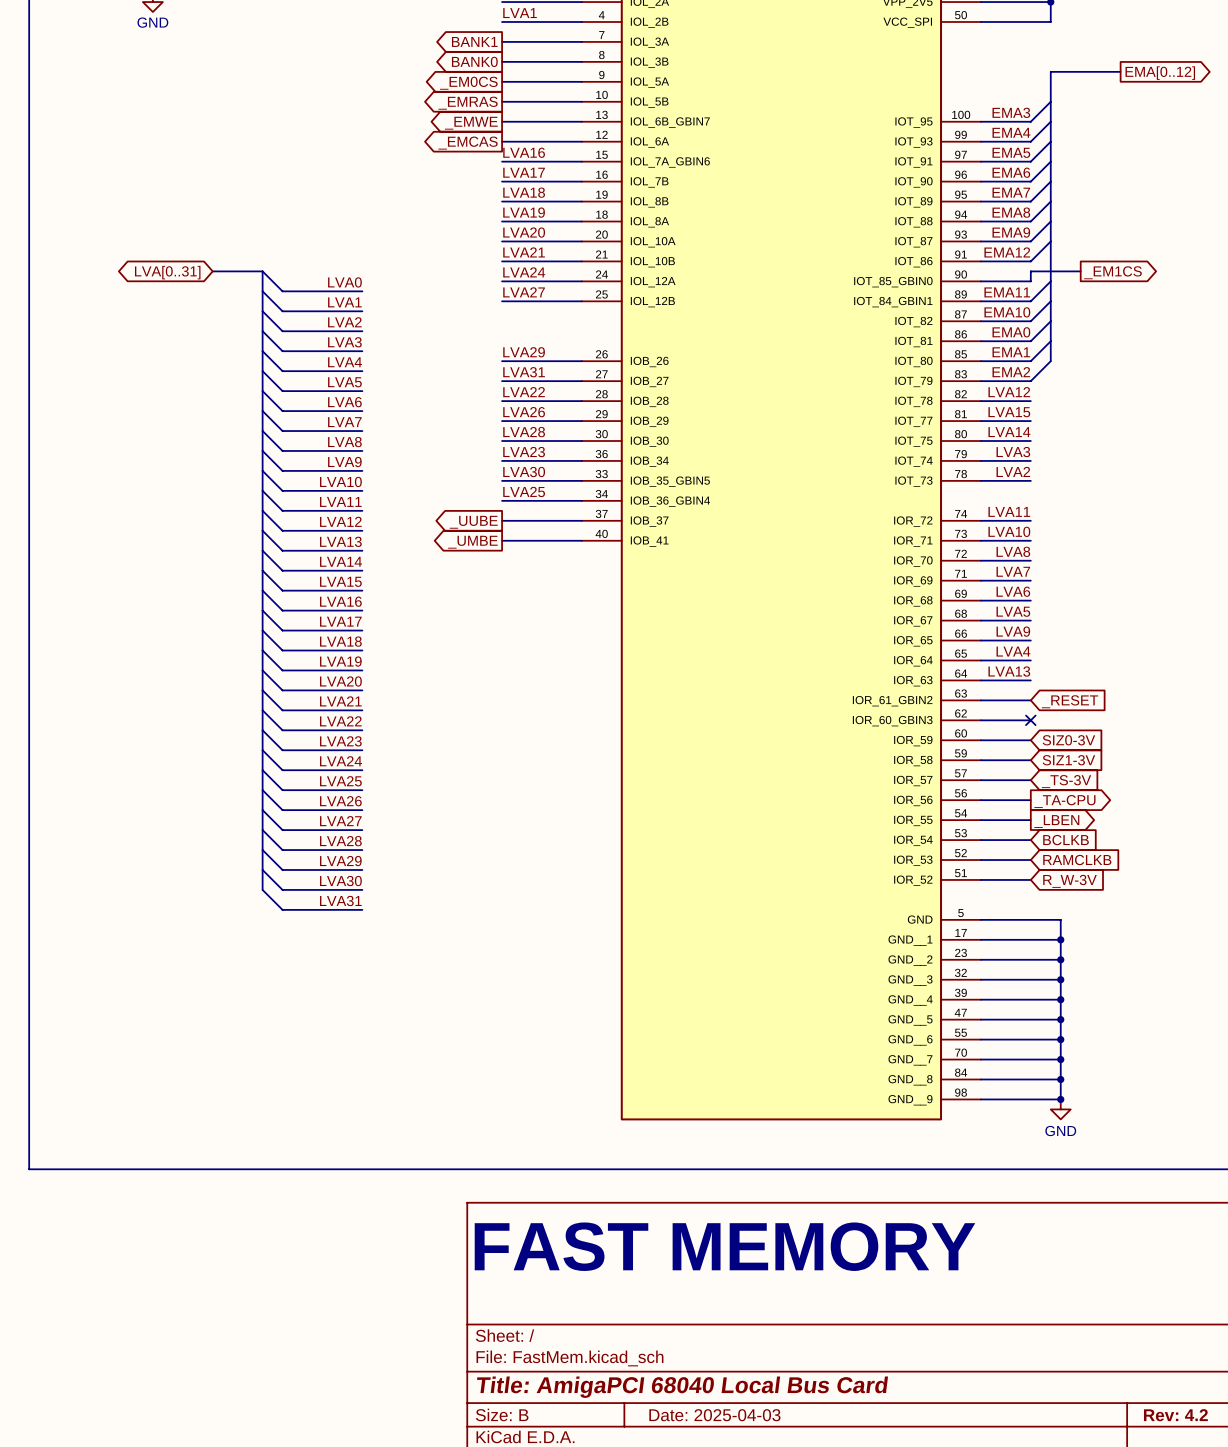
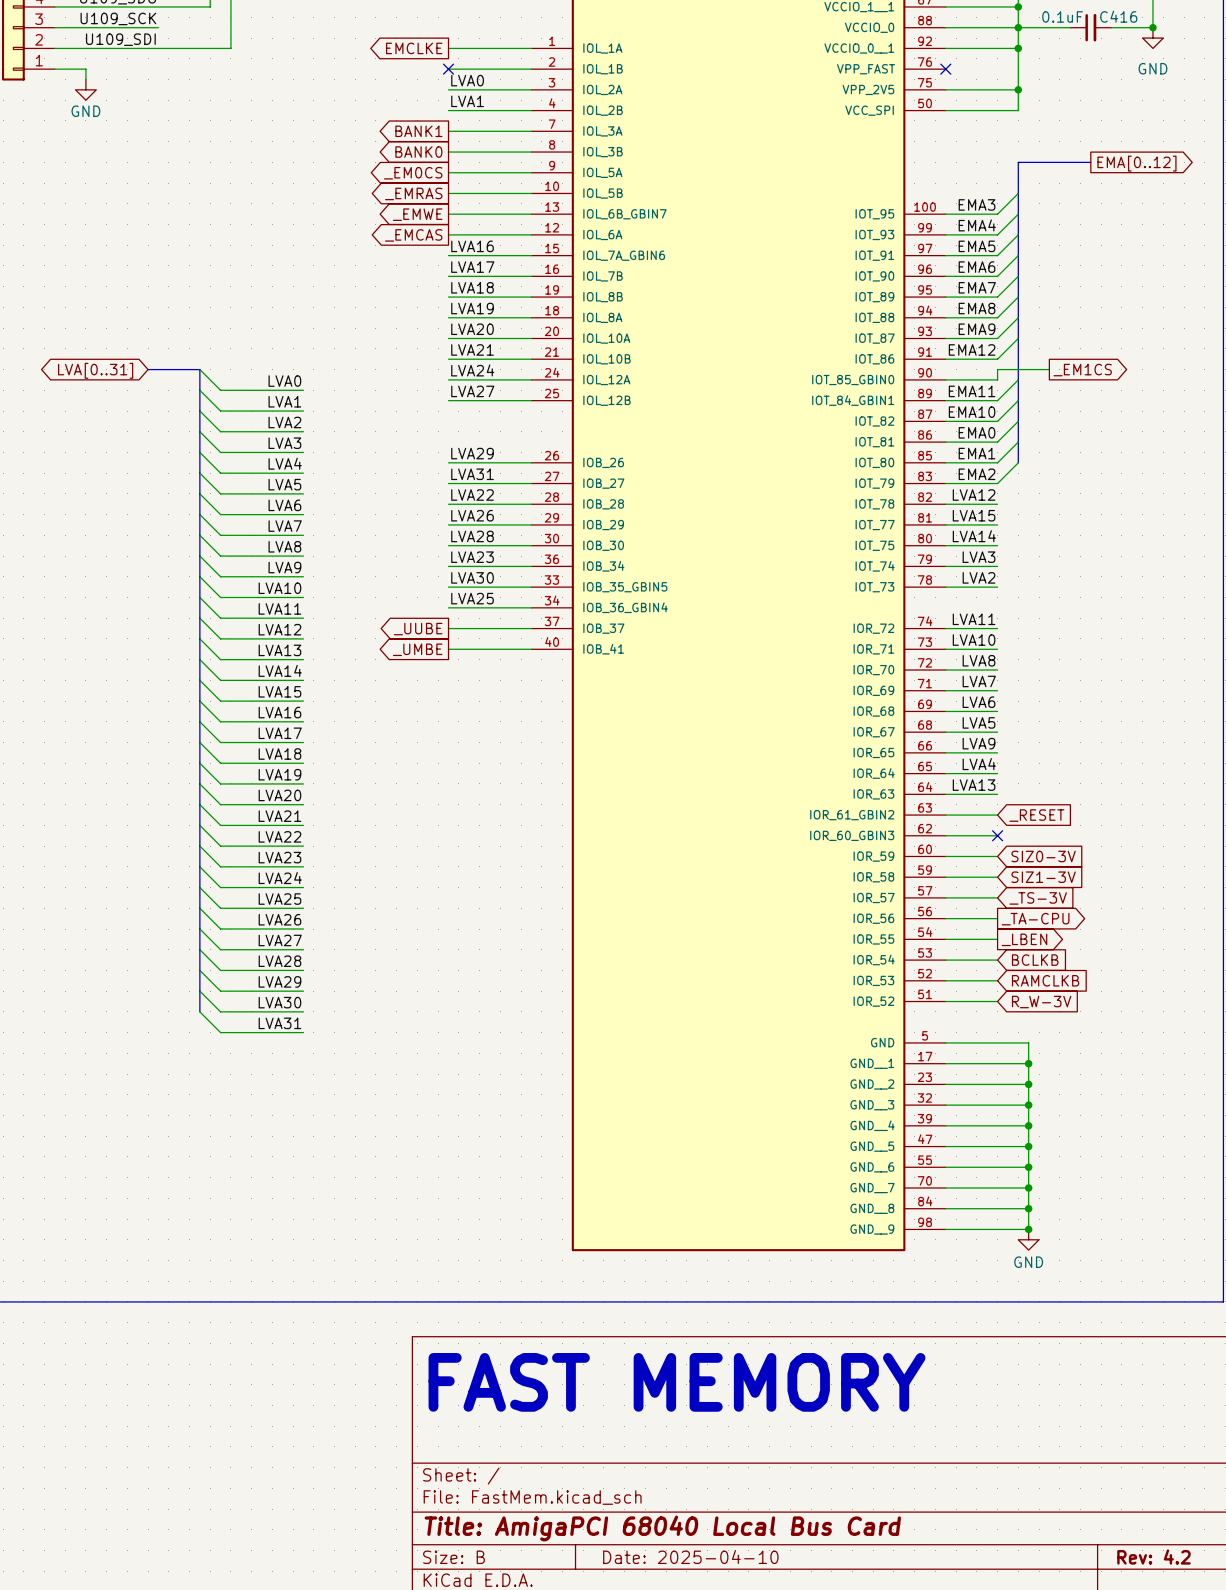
title block: Date: 2025-04-03 (714, 1415) -> Date: 2025-04-10 (690, 1557)

